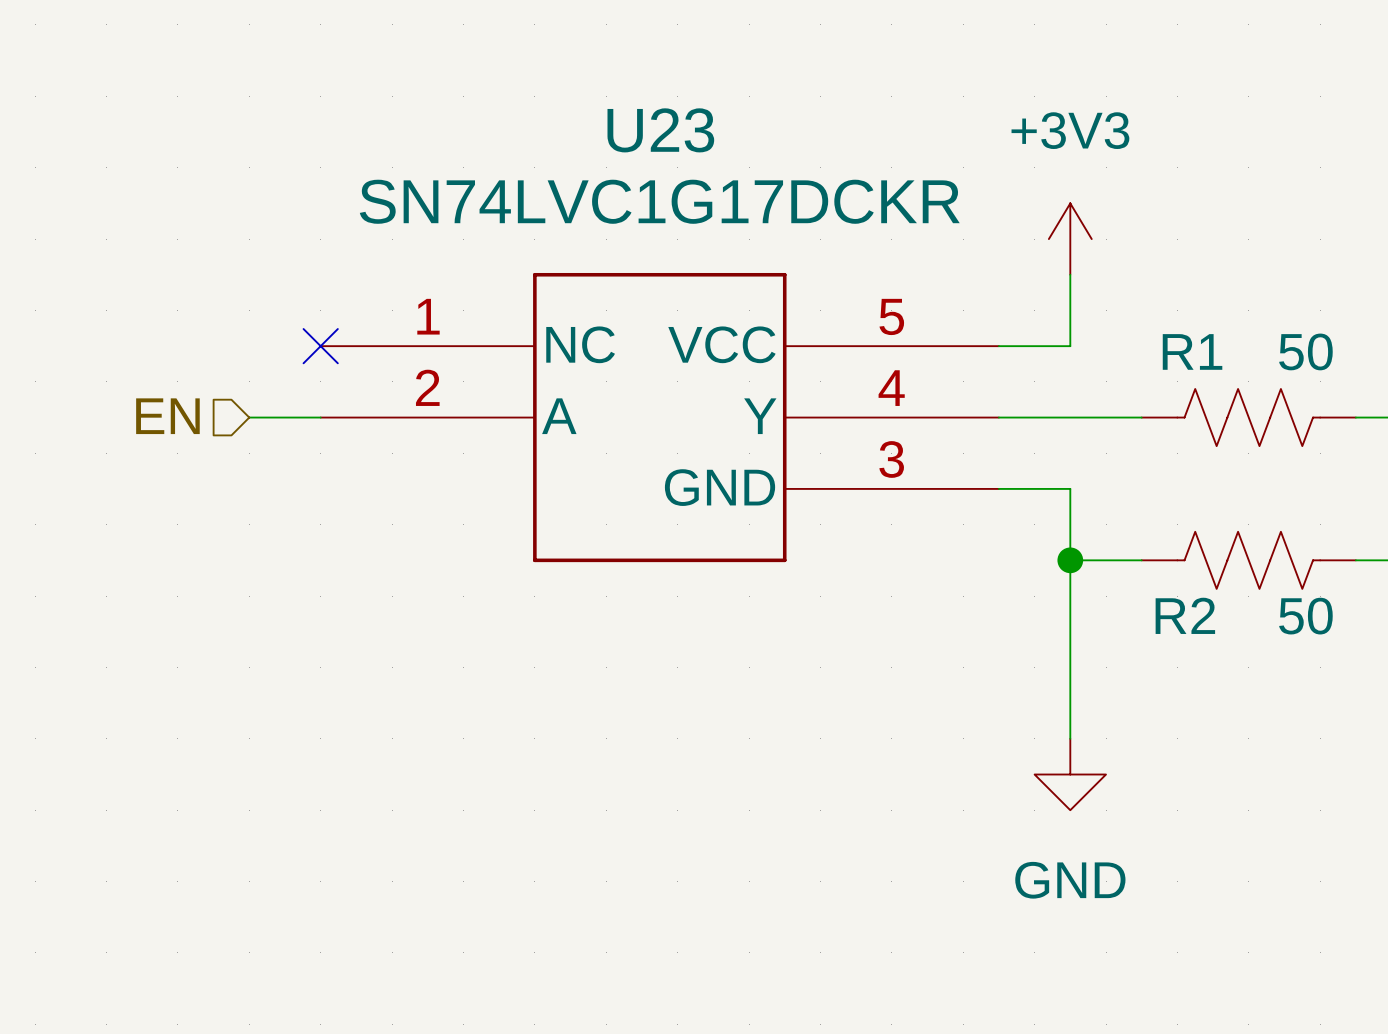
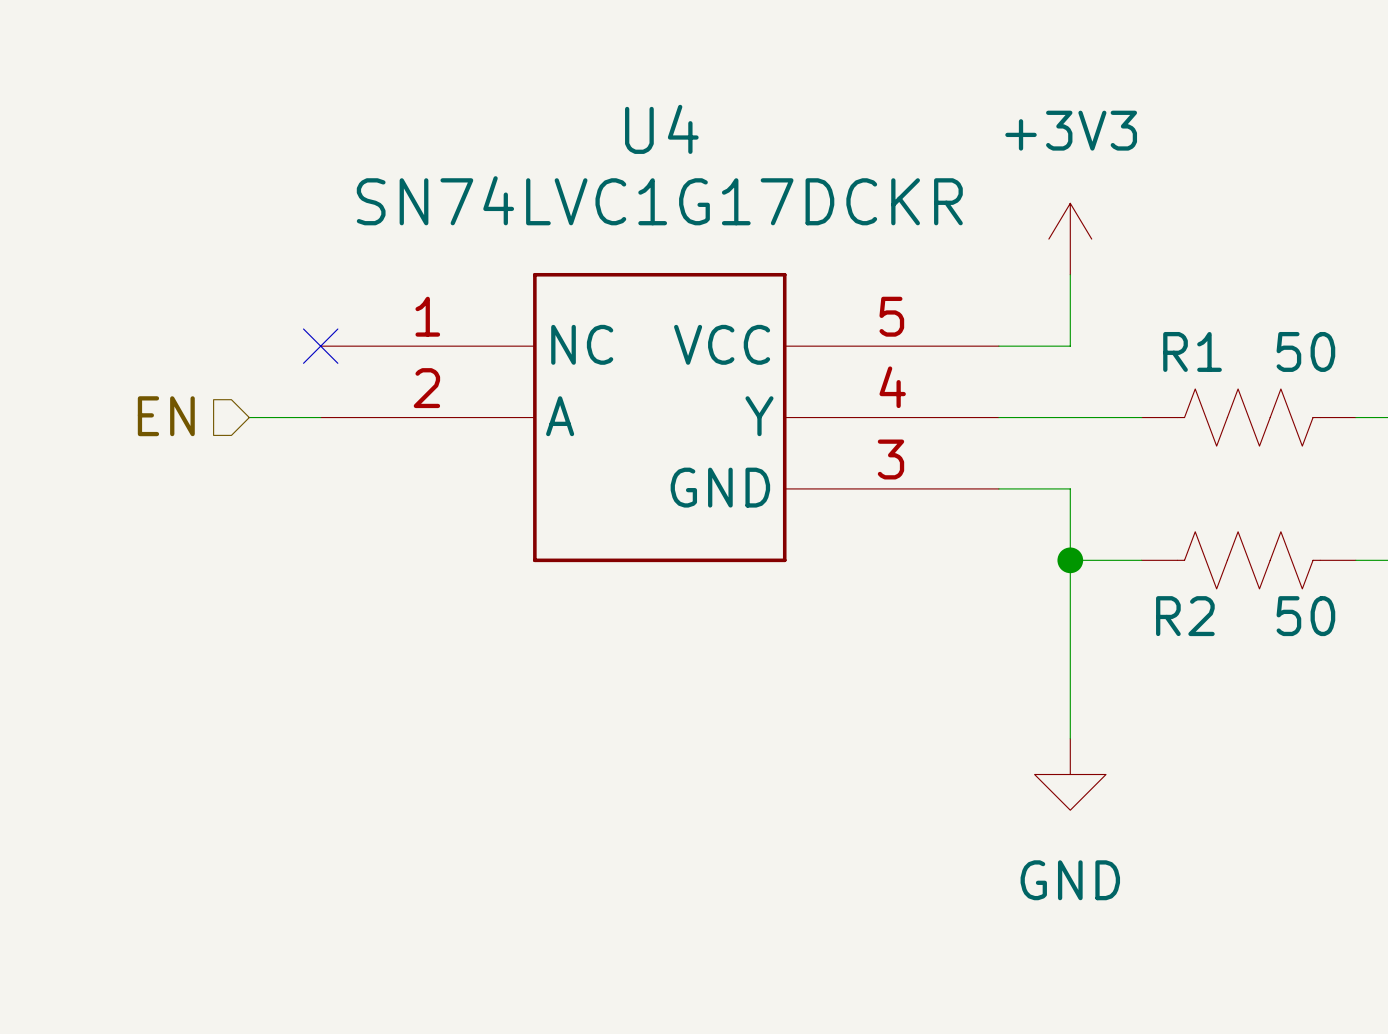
U23 name: U23 (660, 130) -> U4 (661, 129)

